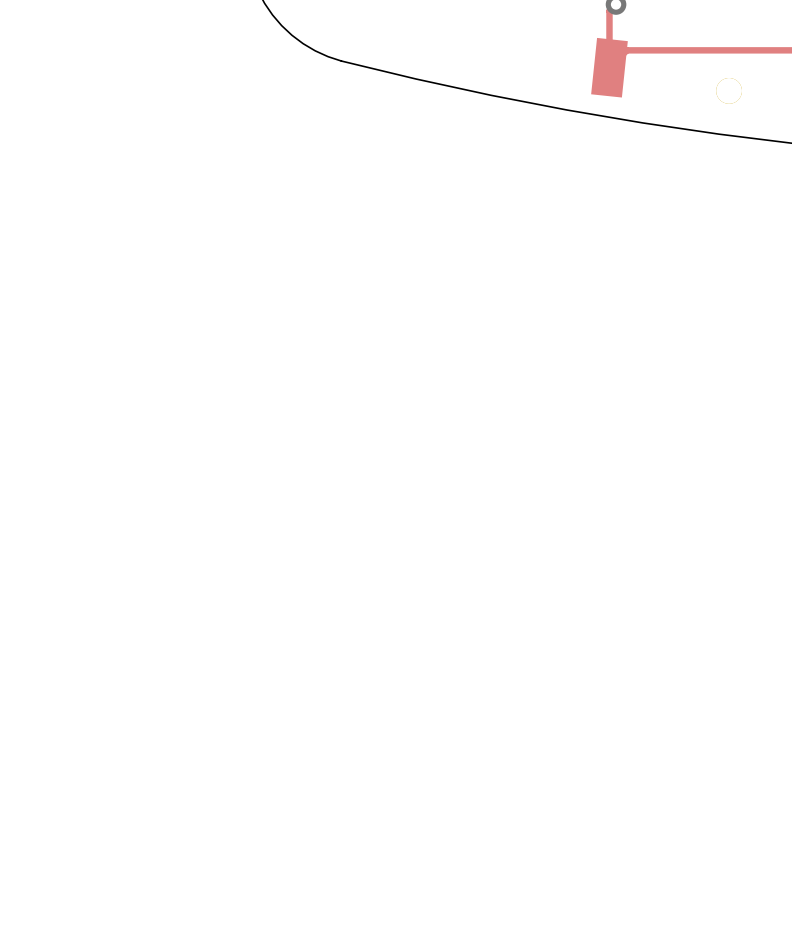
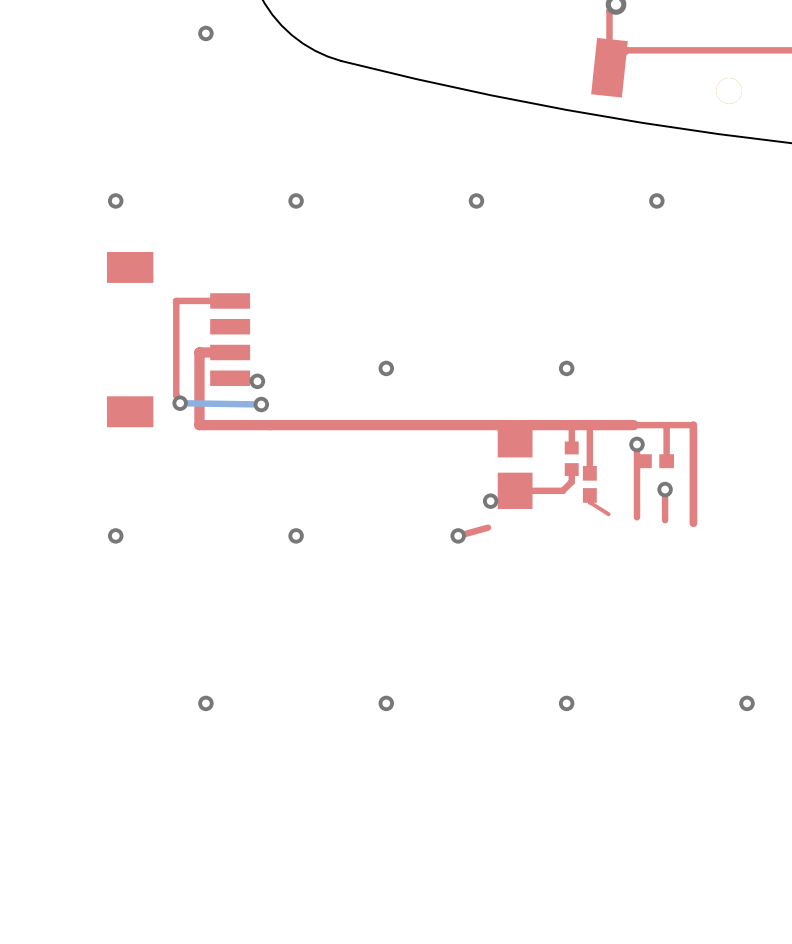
via: none -> (205, 33)
via: none -> (115, 200)
via: none -> (296, 200)
via: none -> (476, 200)
via: none -> (656, 200)
top track: none -> (231, 300) (176, 300) (176, 395) (180, 403)
part: none -> (178, 339)
top track: none -> (230, 352) (199, 352) (199, 425) (693, 425) (693, 523)
via: none -> (386, 368)
via: none -> (566, 368)
via: none -> (257, 381)
bottom track: none -> (180, 403) (261, 404)
via: none -> (180, 403)
via: none -> (261, 404)
top track: none -> (571, 425) (571, 448)
top track: none -> (589, 425) (589, 473)
top track: none -> (666, 425) (666, 461)
top track: none -> (637, 444) (637, 517)
via: none -> (637, 444)
part: none -> (571, 458)
part: none -> (655, 461)
part: none -> (515, 465)
top track: none -> (571, 469) (571, 481) (562, 490) (515, 490) (515, 501)
part: none -> (589, 484)
top track: none -> (665, 489) (665, 520)
via: none -> (665, 489)
top track: none -> (589, 495) (589, 502) (608, 514)
via: none -> (490, 501)
top track: none -> (488, 527) (458, 535)
via: none -> (115, 535)
via: none -> (296, 535)
via: none -> (458, 535)
via: none -> (205, 703)
via: none -> (386, 703)
via: none -> (566, 703)
via: none -> (747, 703)

